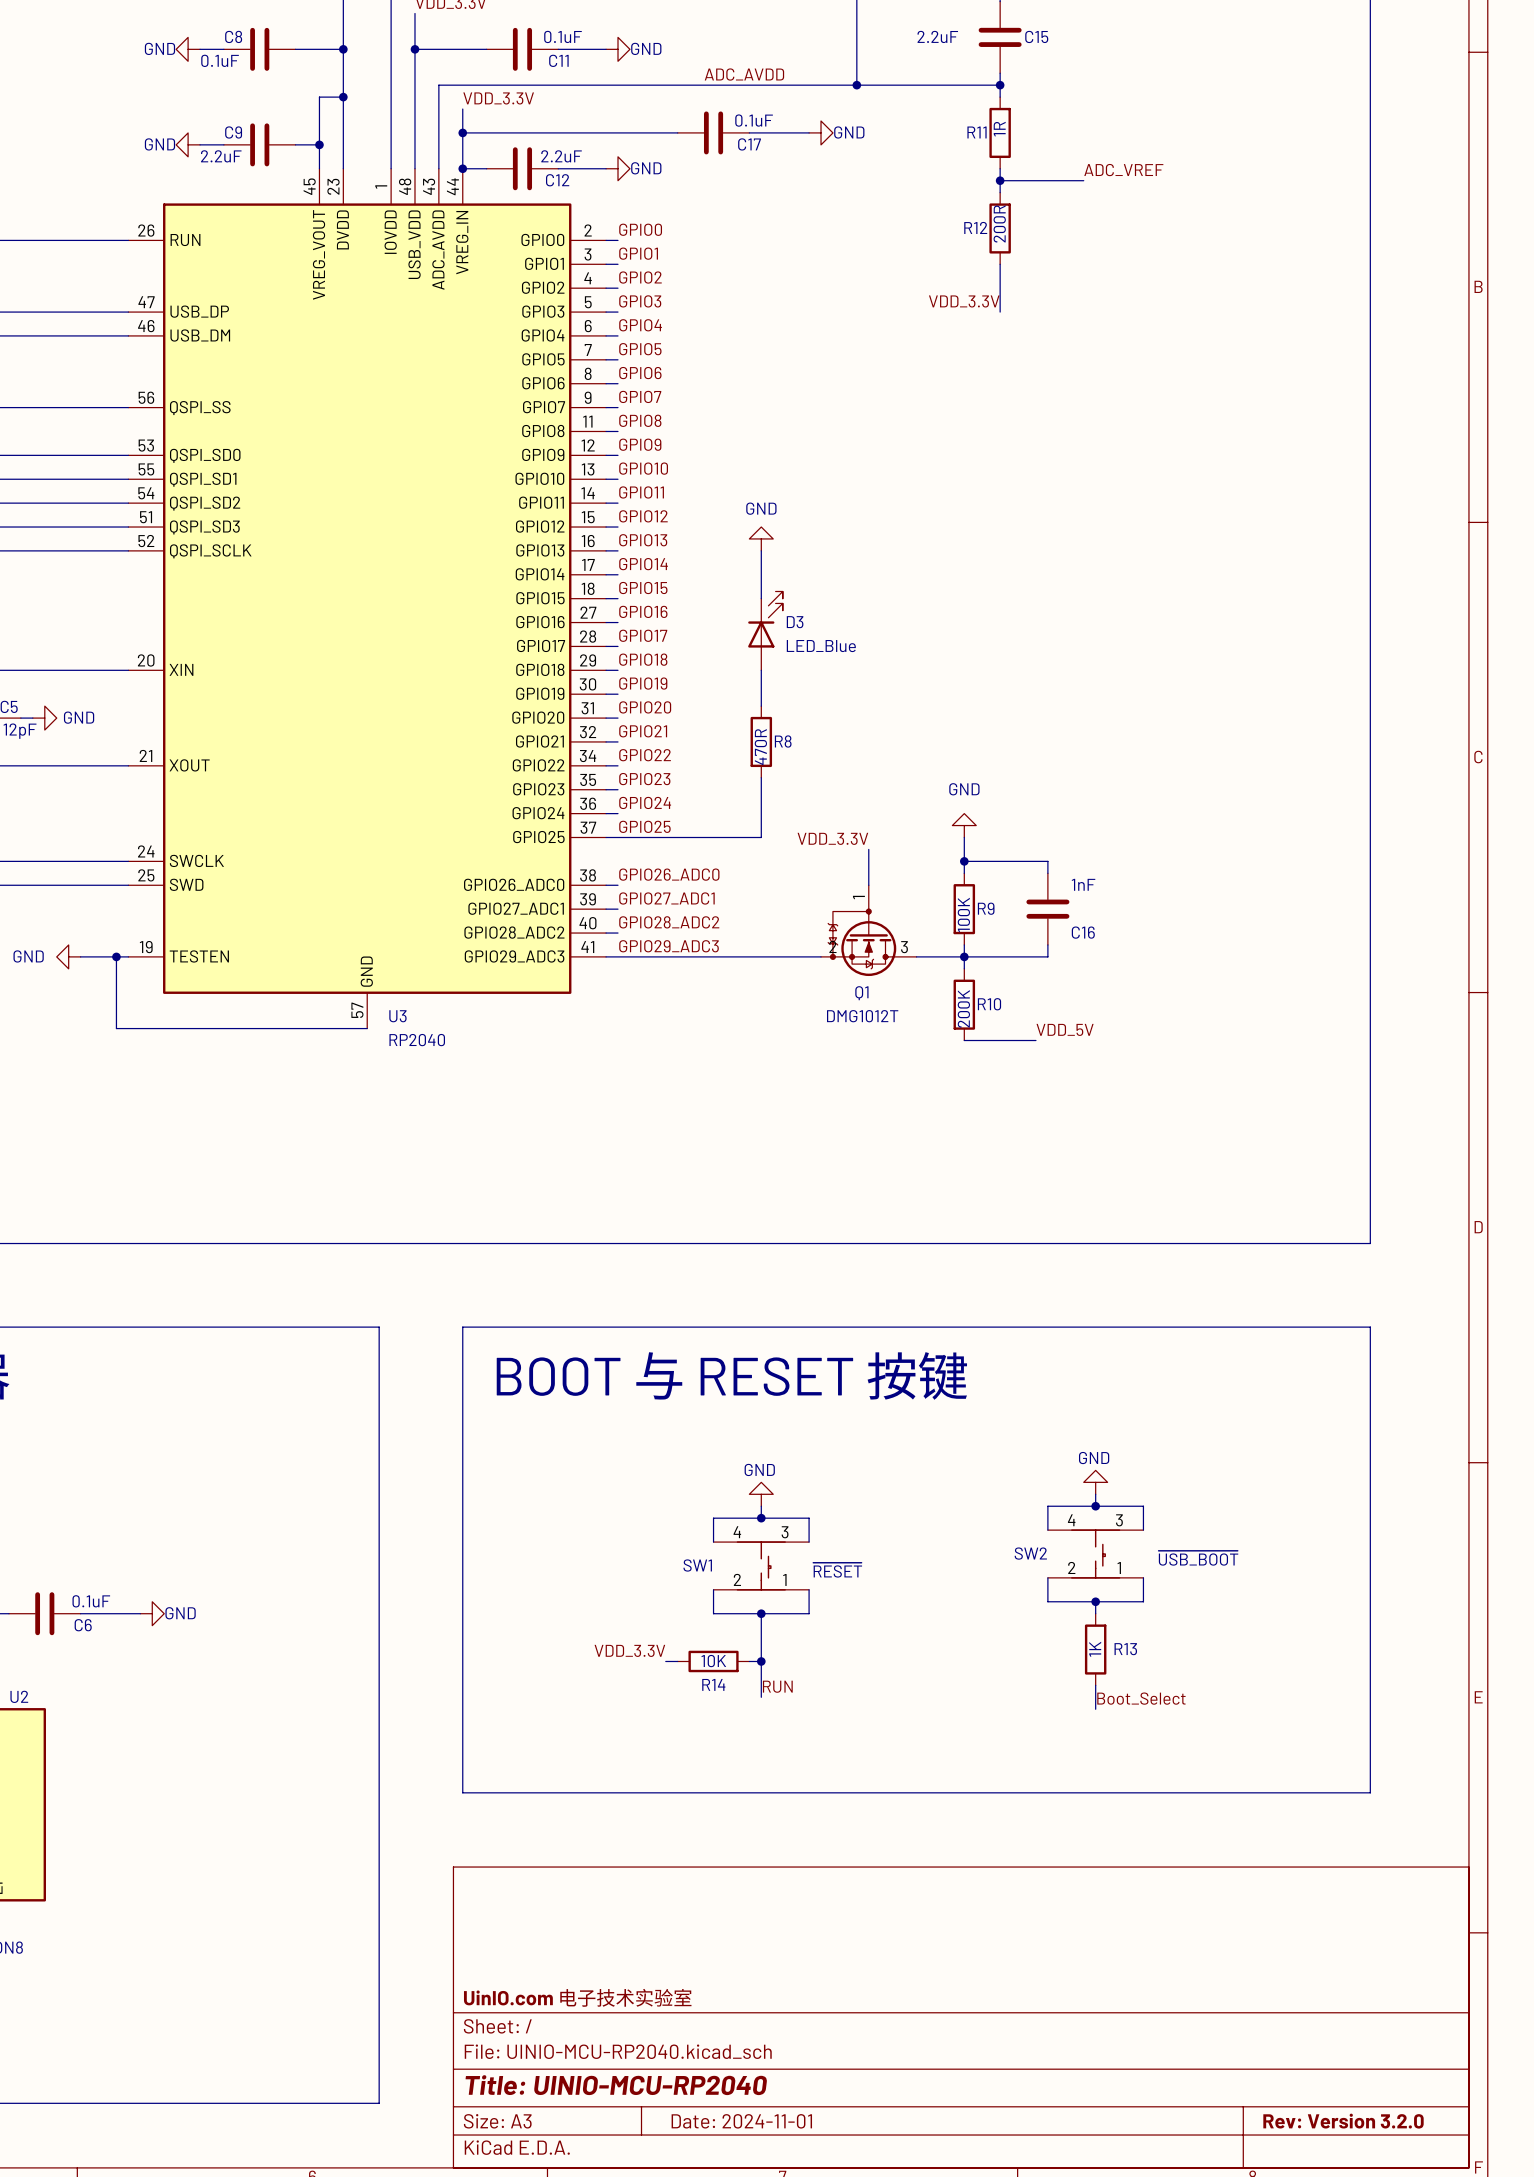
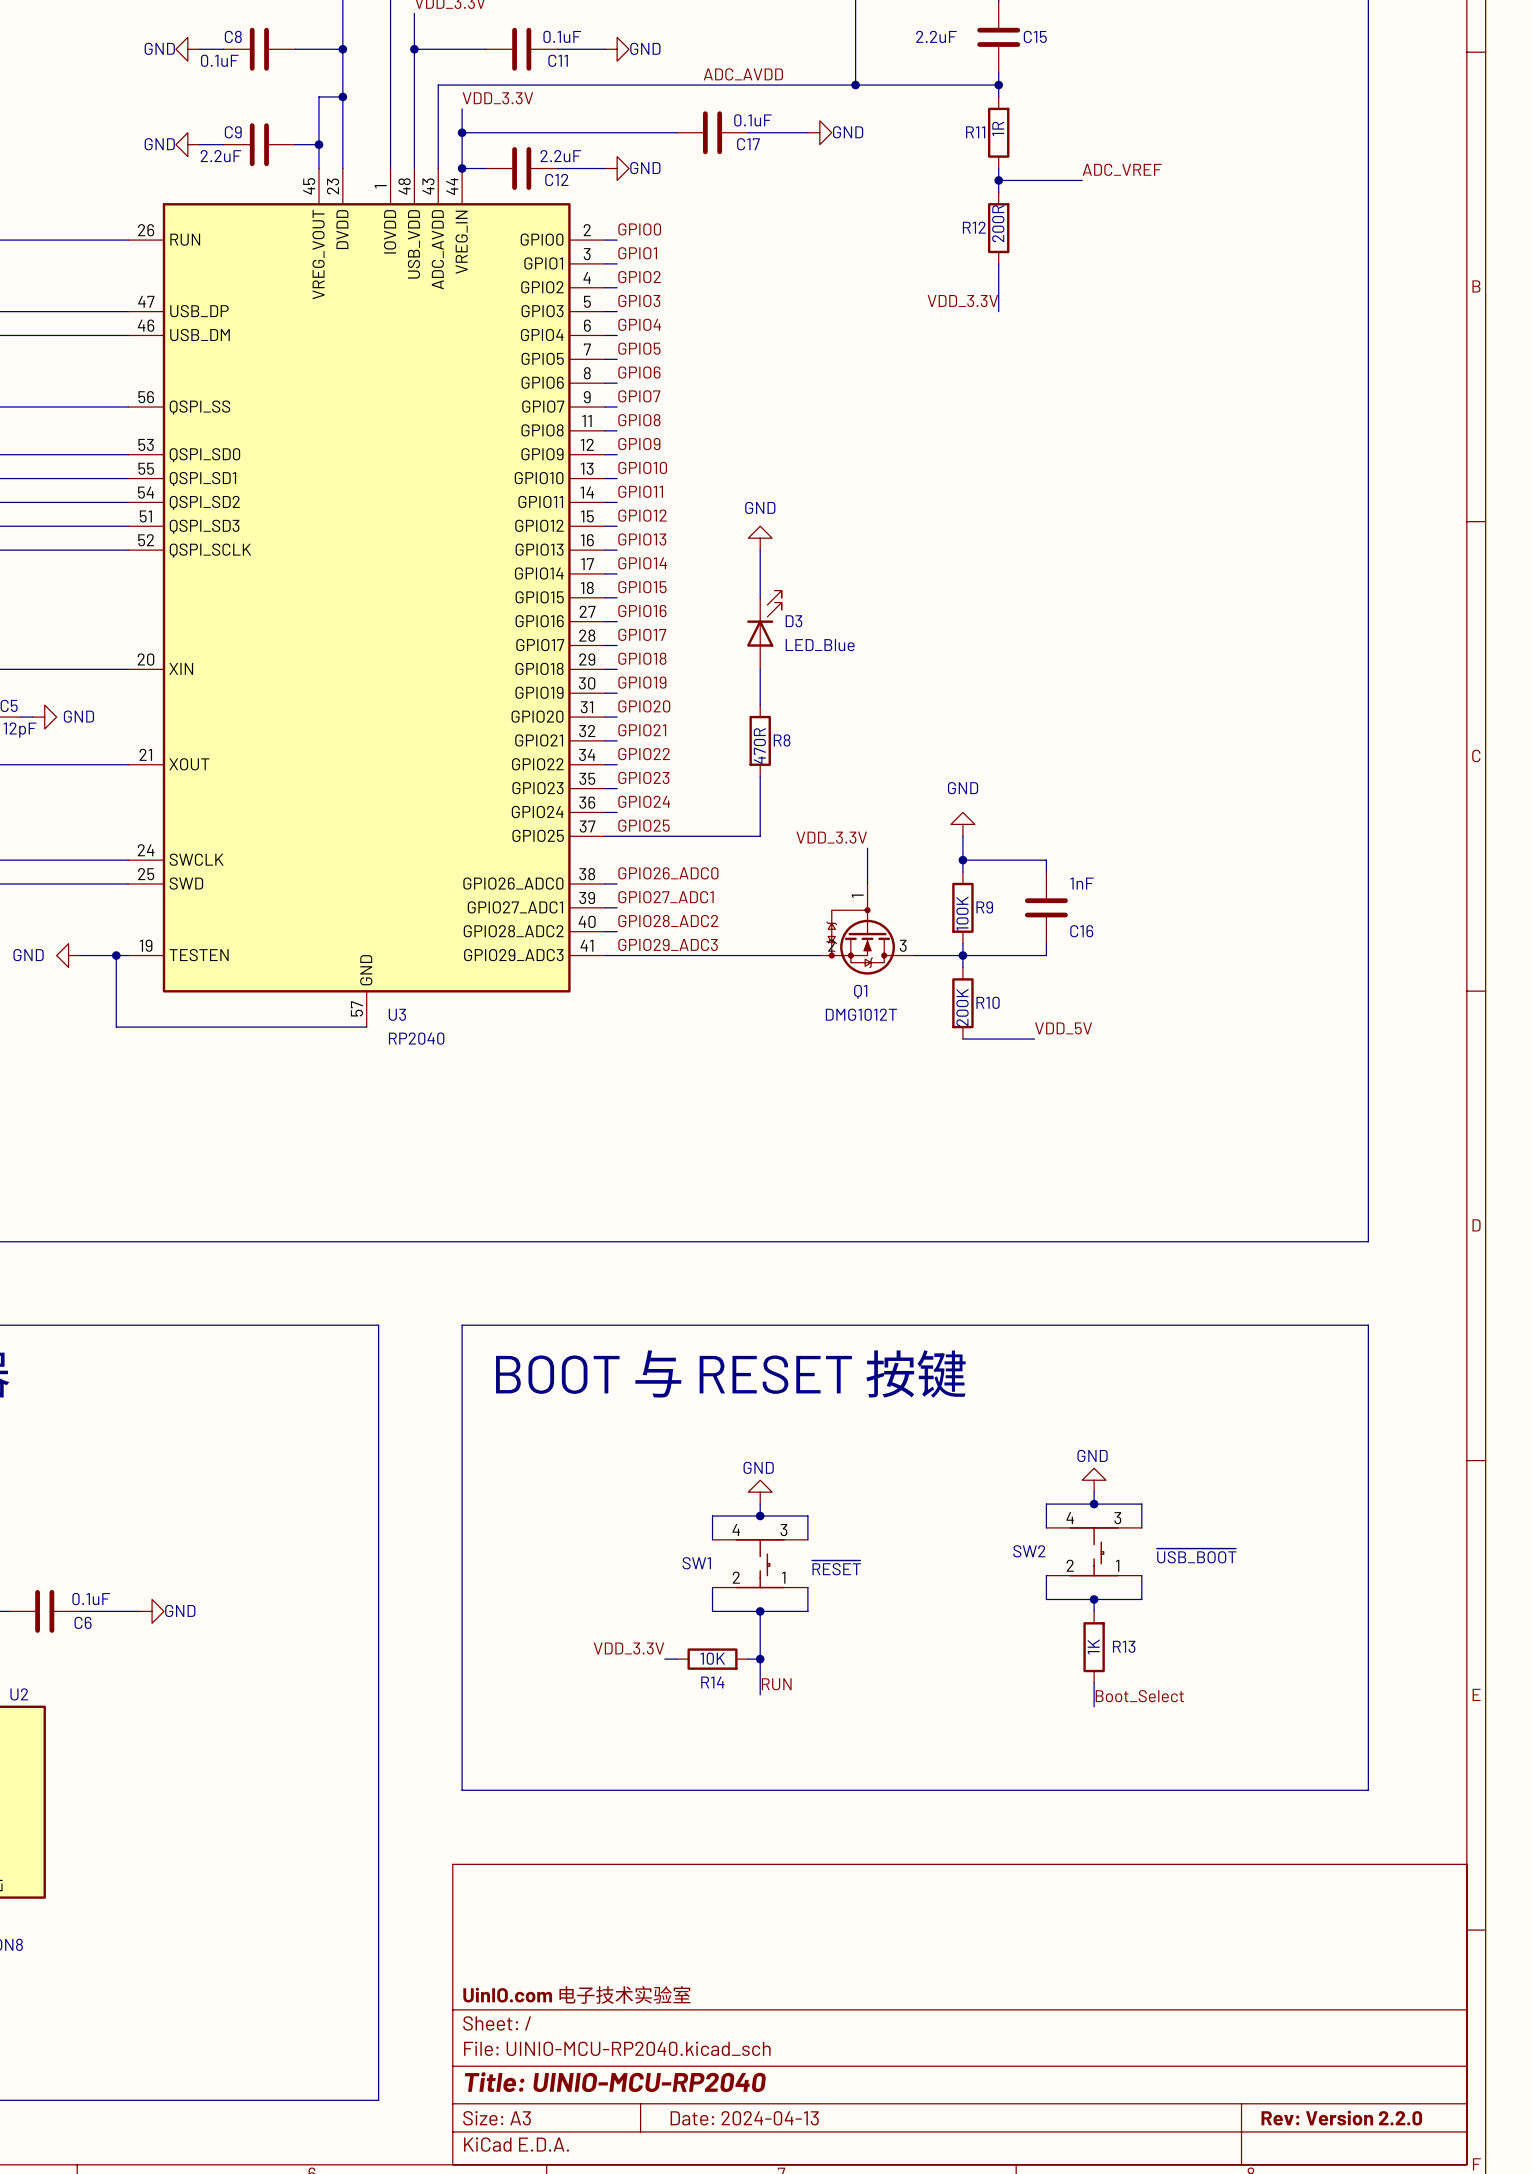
title block: Date: 2024-11-01 (741, 2121) -> Date: 2024-04-13 (744, 2118)
title block: Rev: Version 3.2.0 (1343, 2121) -> Rev: Version 2.2.0 (1341, 2118)

